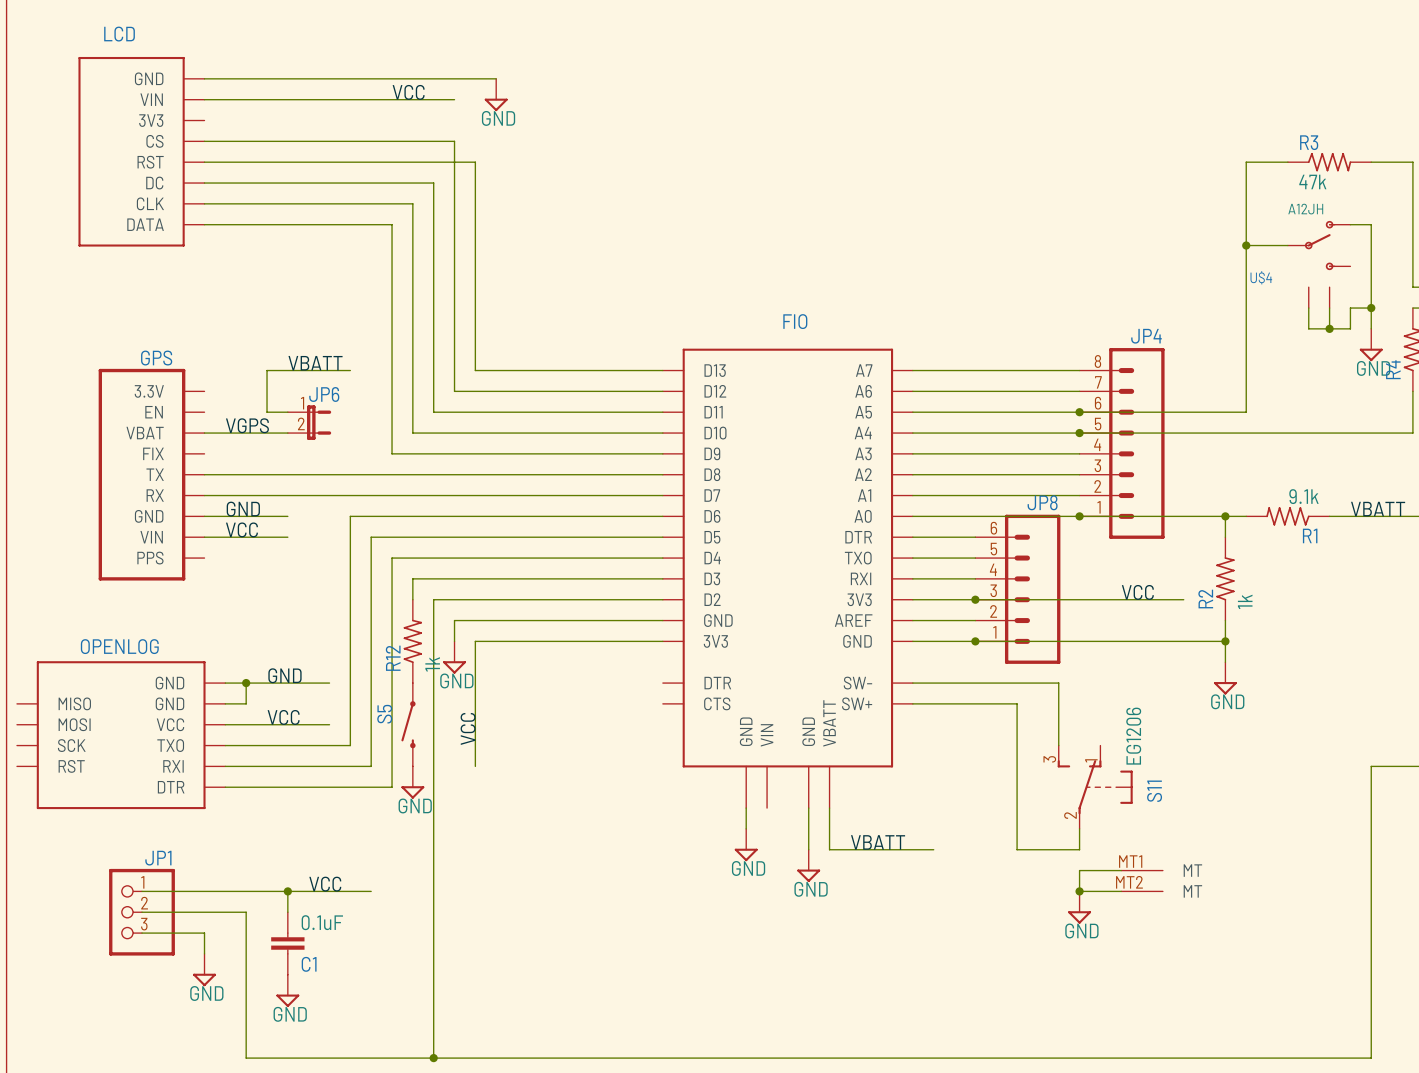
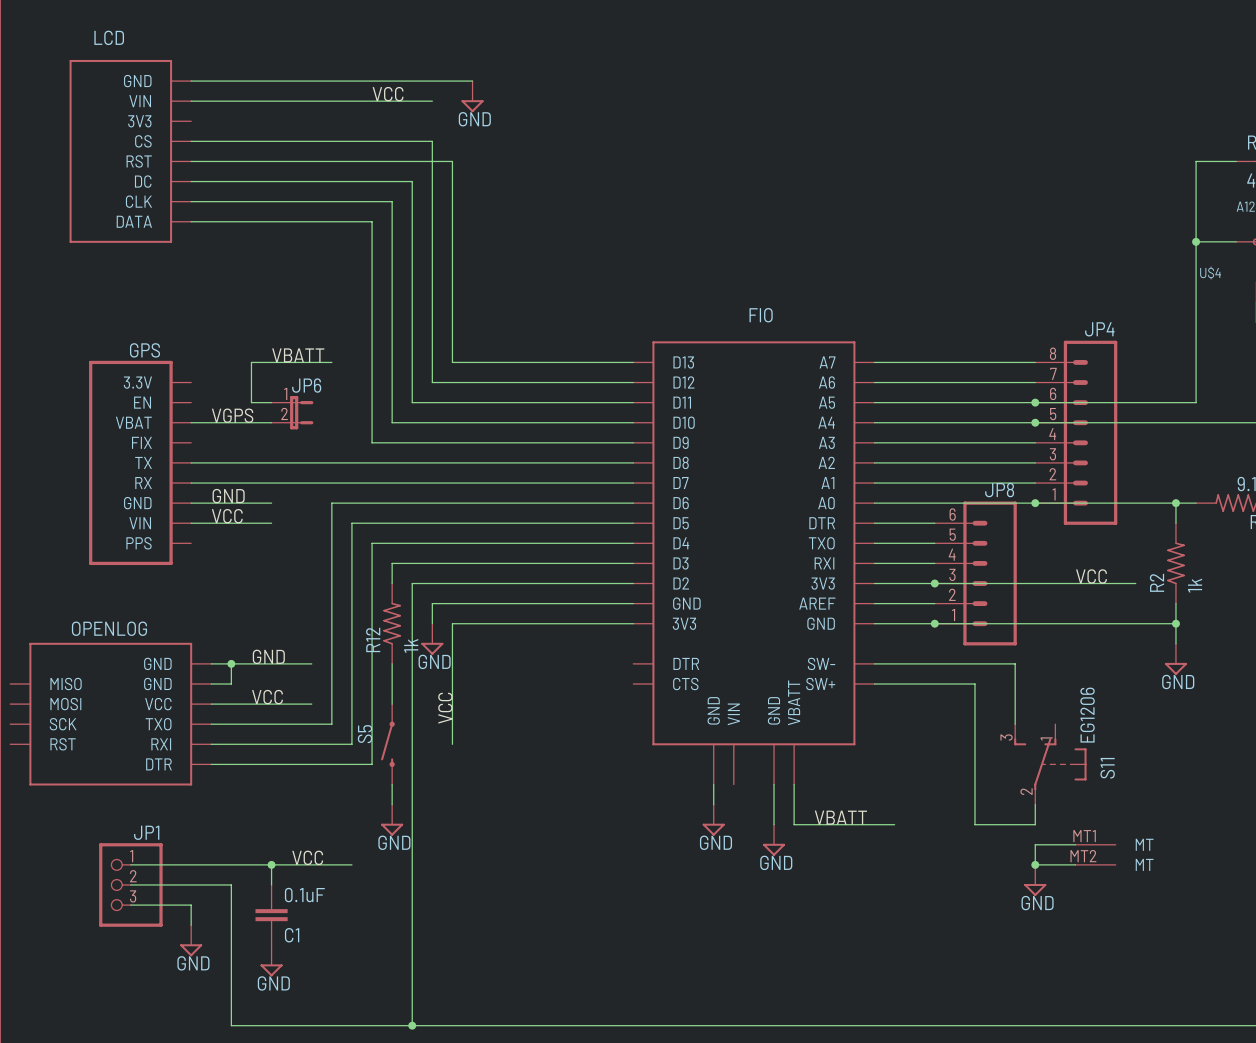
S5 position: (408, 724) -> (387, 744)
power symbol position: GND (412, 782) -> GND (392, 820)
wire: none -> (392, 784) (392, 804)

